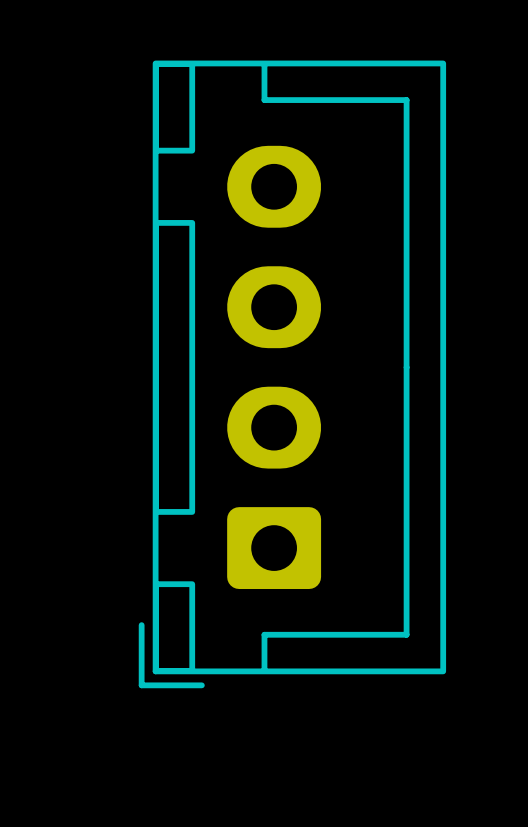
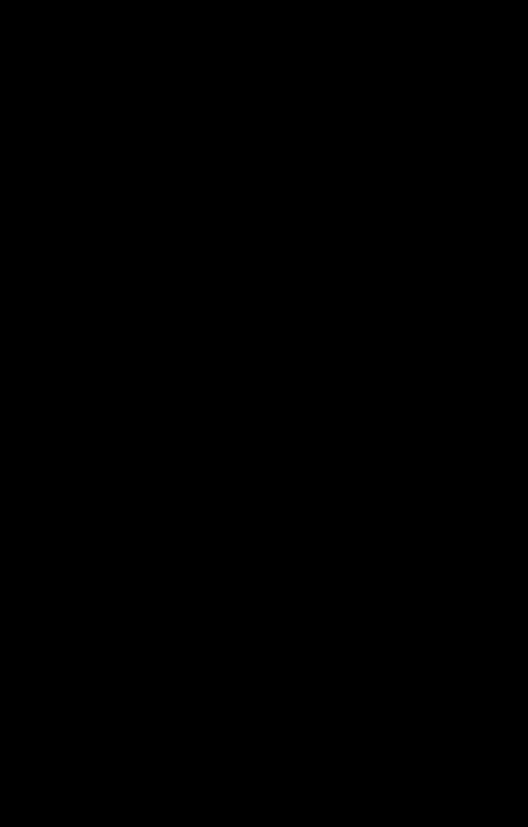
part: (292, 374) -> none

